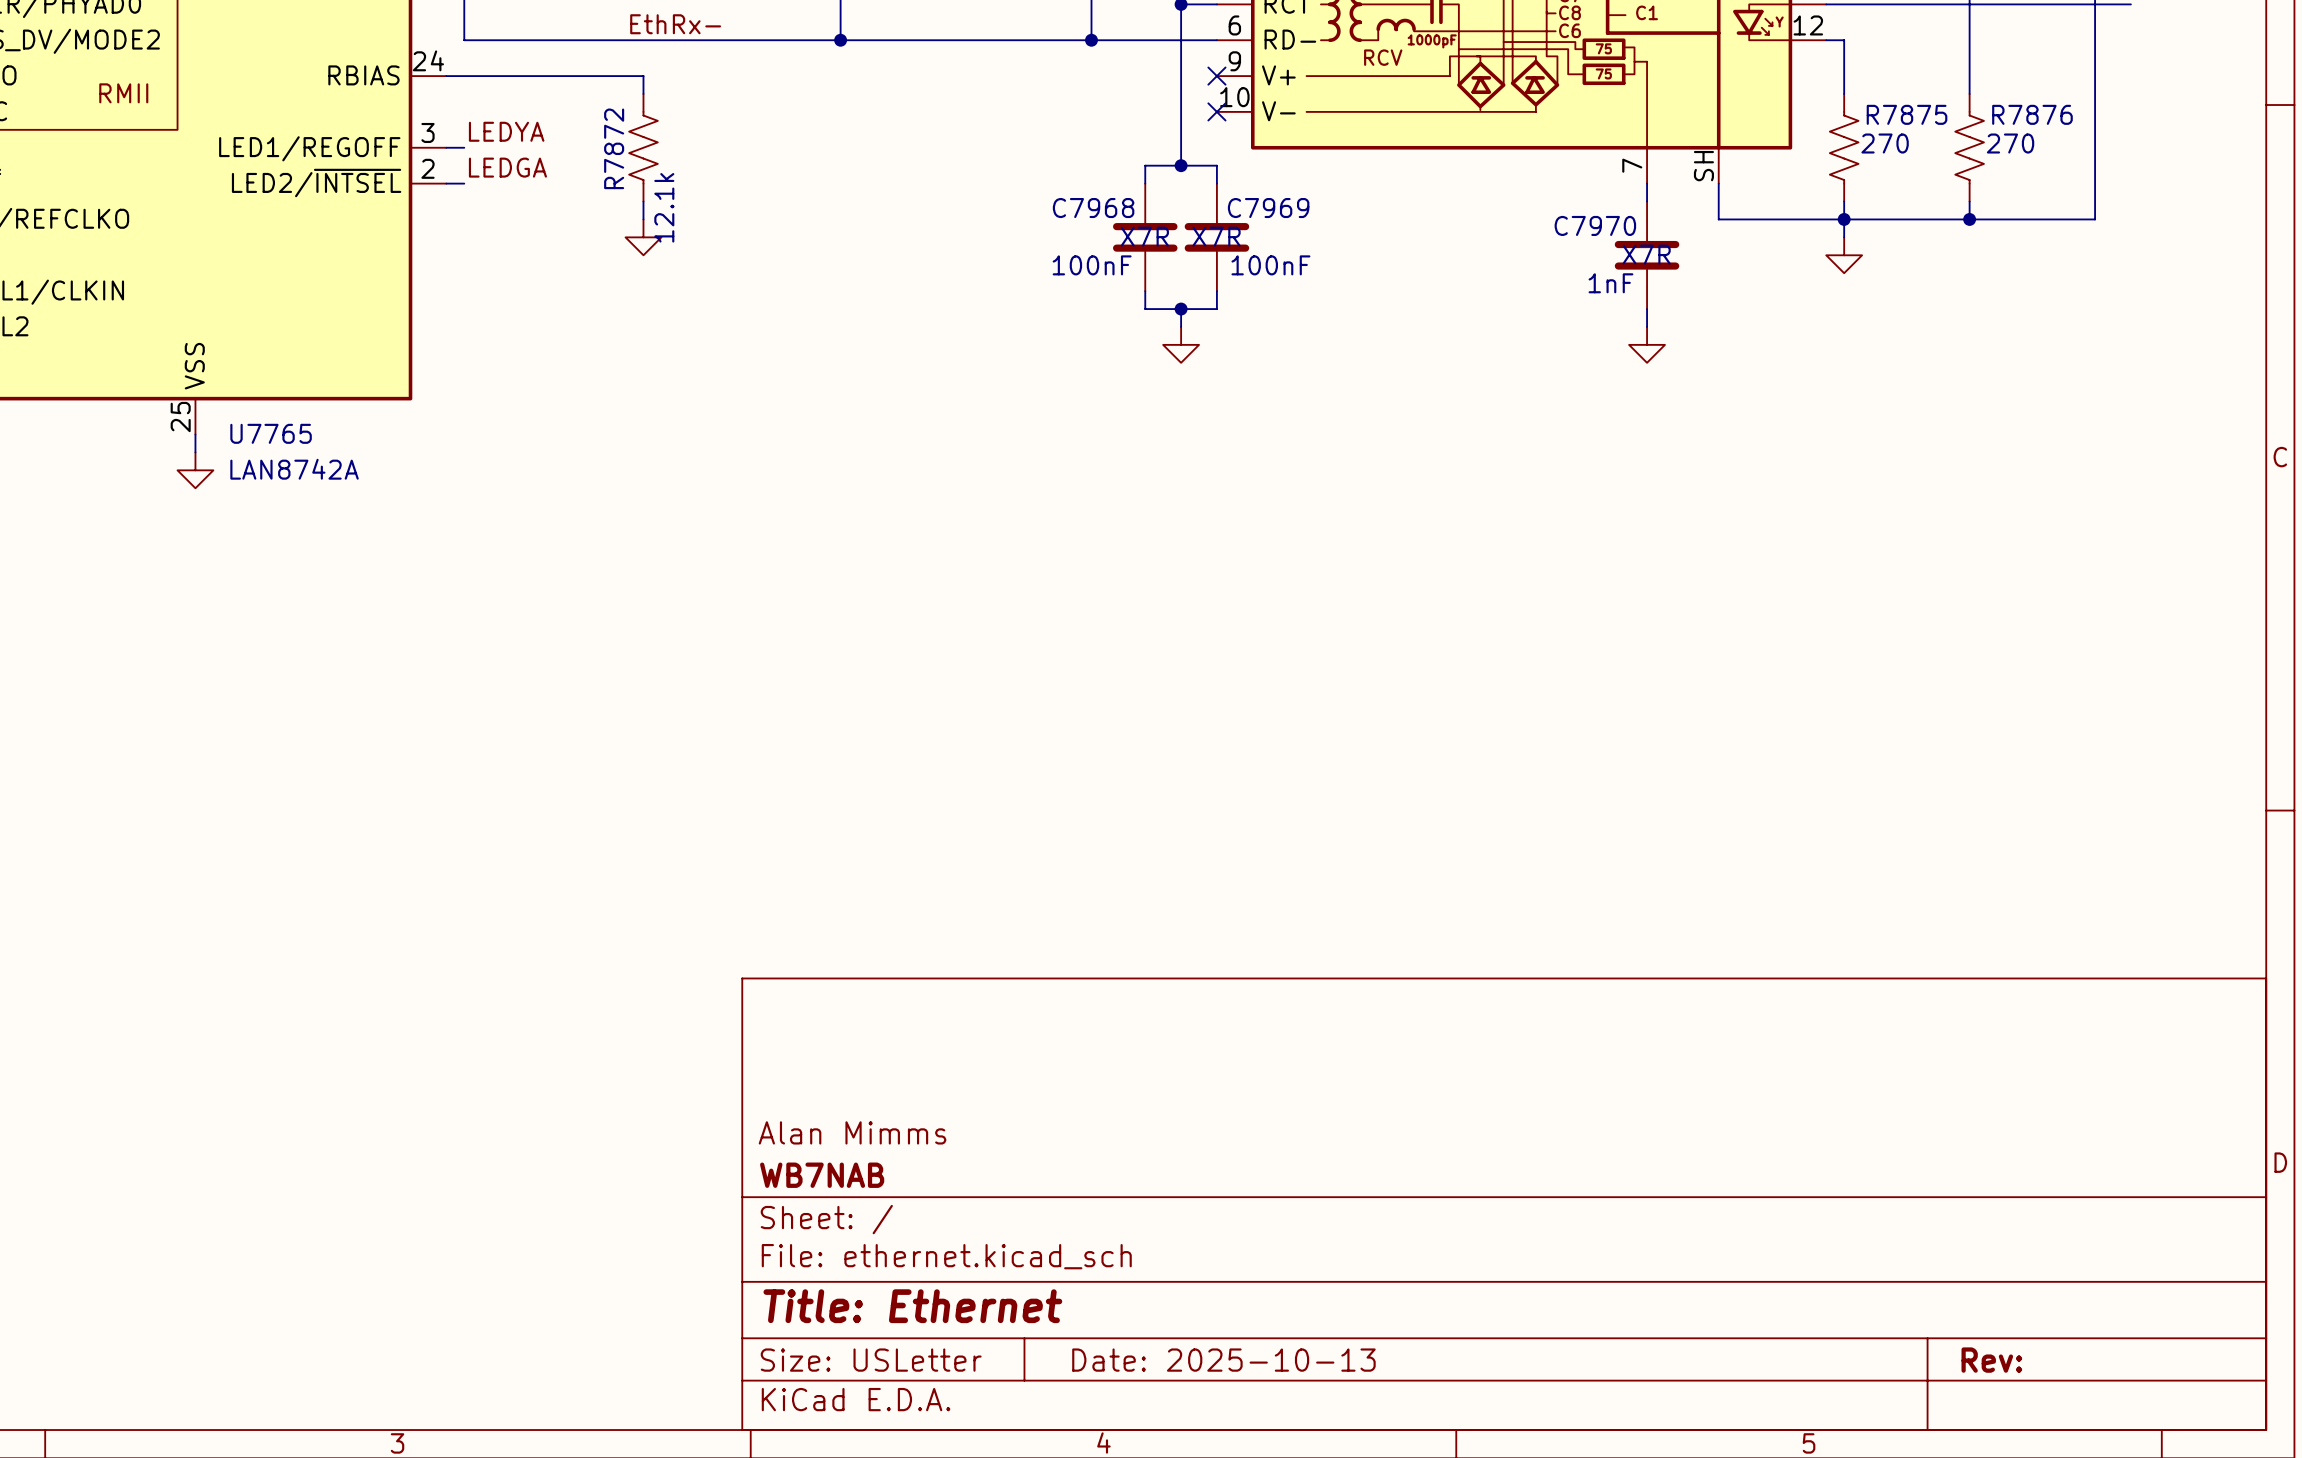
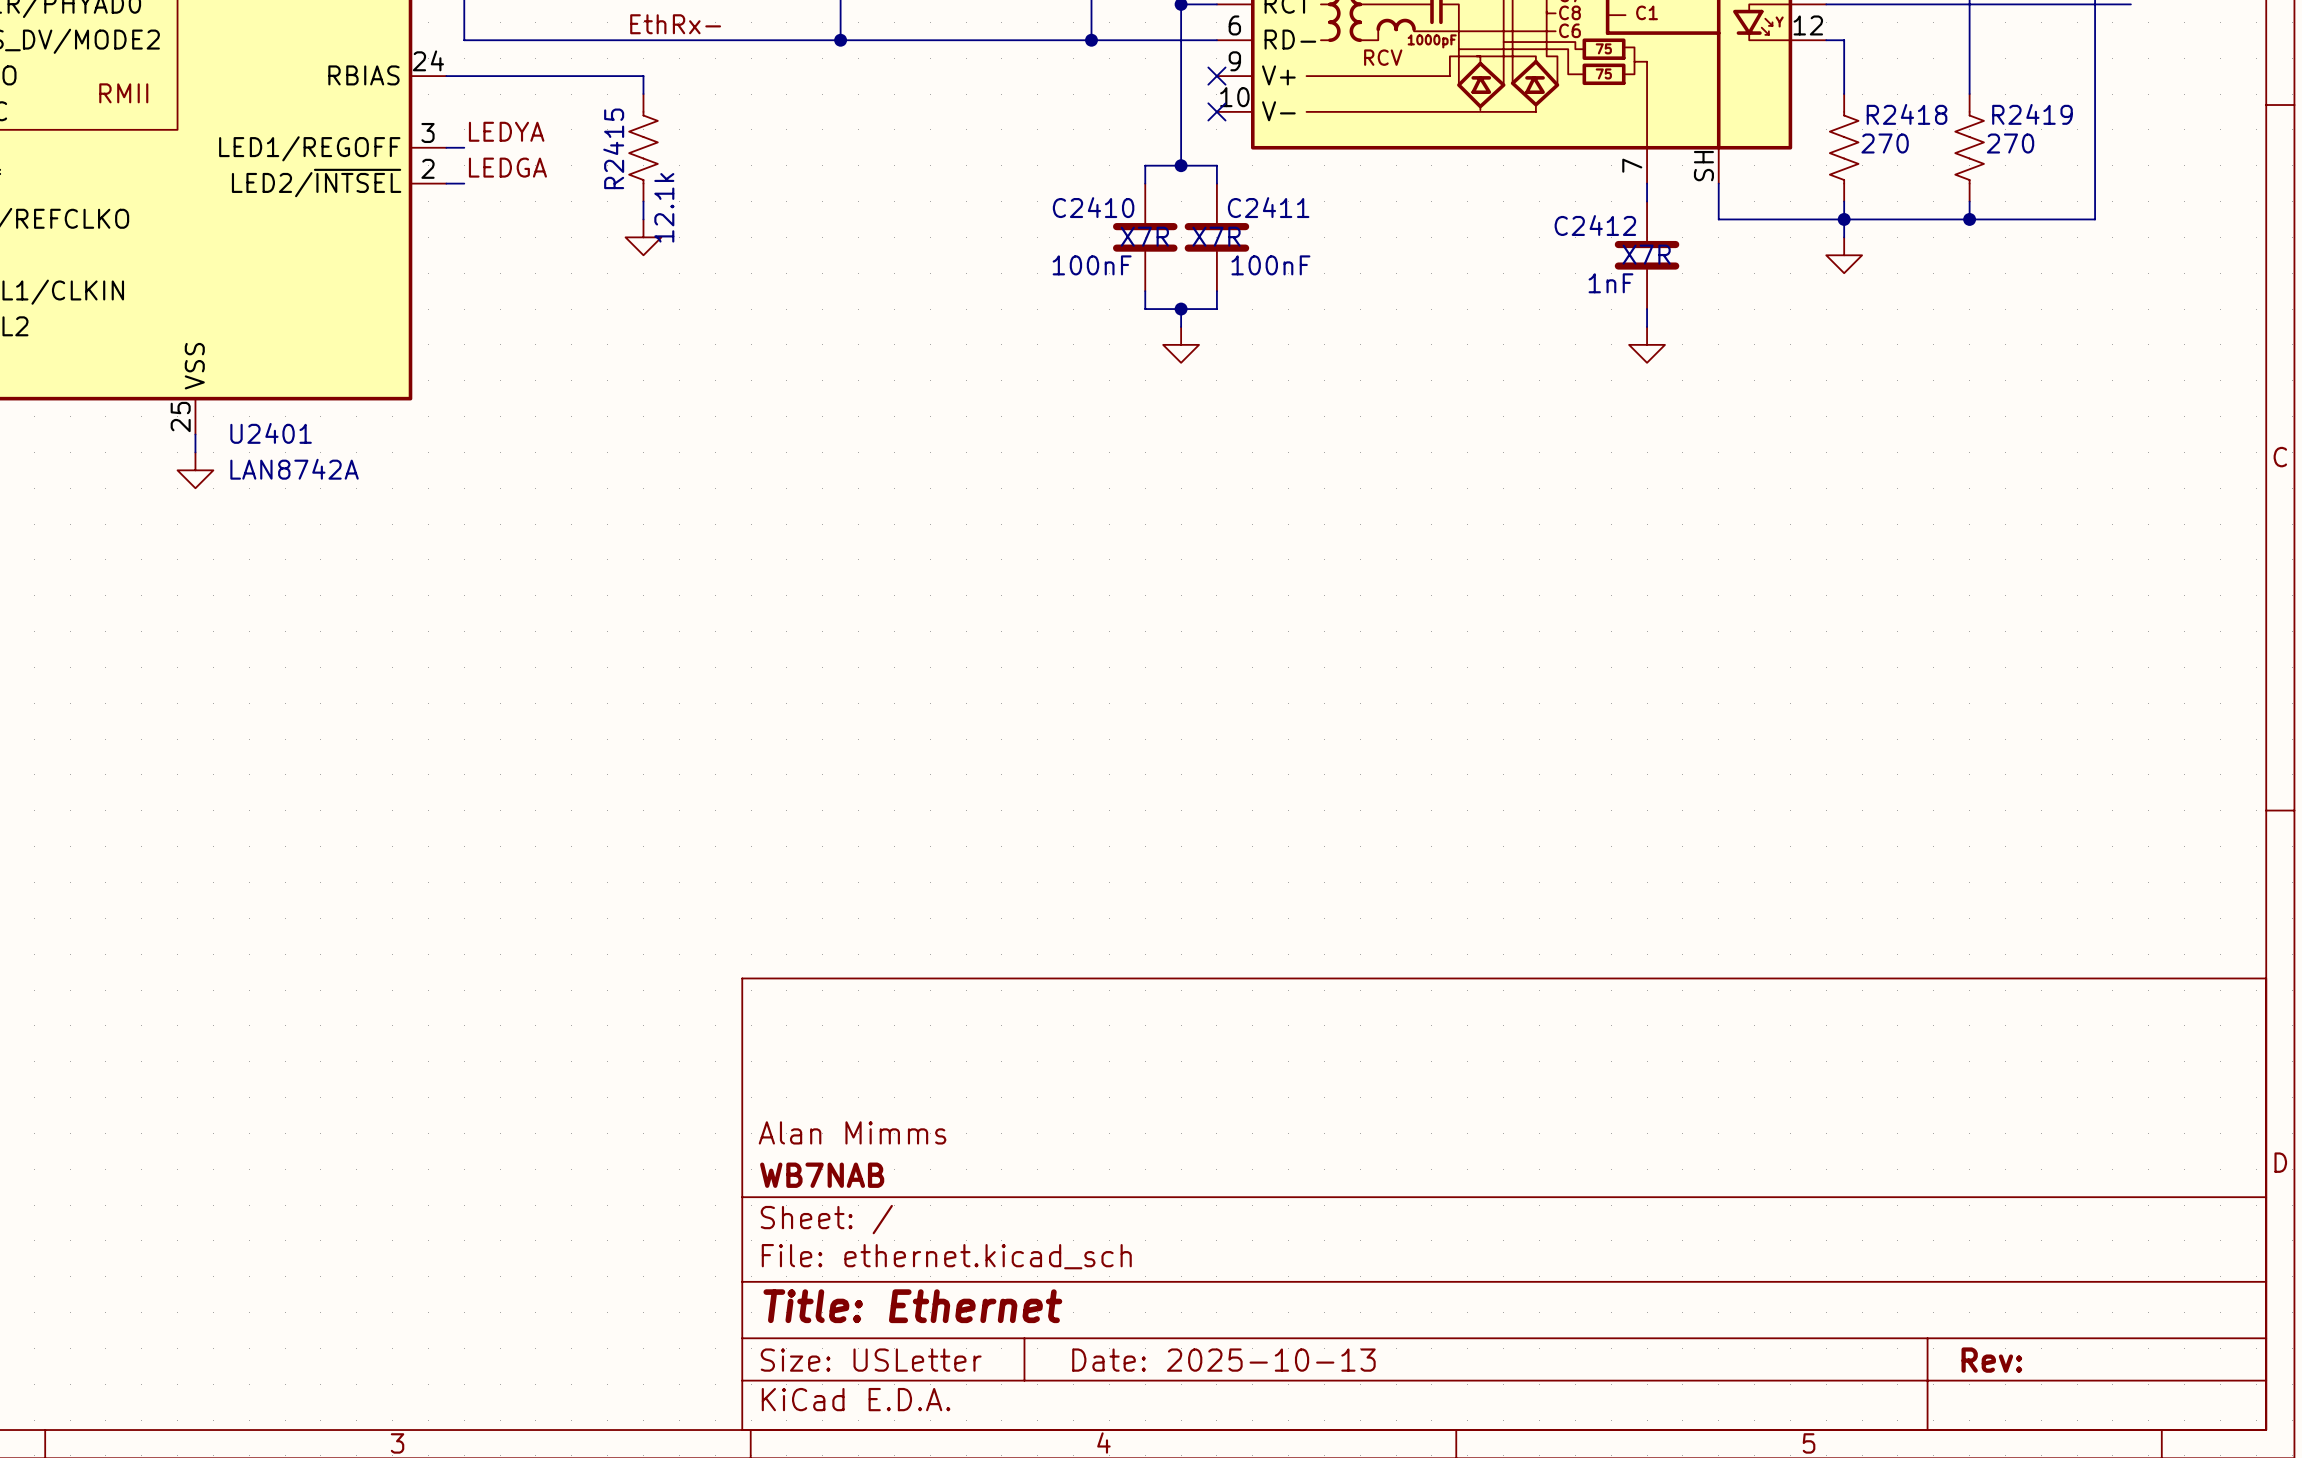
R7875 name: R7875 (1907, 114) -> R2418 (1907, 114)
R7876 name: R7876 (2032, 114) -> R2419 (2032, 114)
R7872 name: R7872 (614, 148) -> R2415 (613, 148)
C7968 name: C7968 (1093, 208) -> C2410 (1093, 207)
C7969 name: C7969 (1268, 208) -> C2411 (1268, 207)
C7970 name: C7970 (1595, 225) -> C2412 (1595, 225)
U7765 name: U7765 (271, 433) -> U2401 (271, 433)

